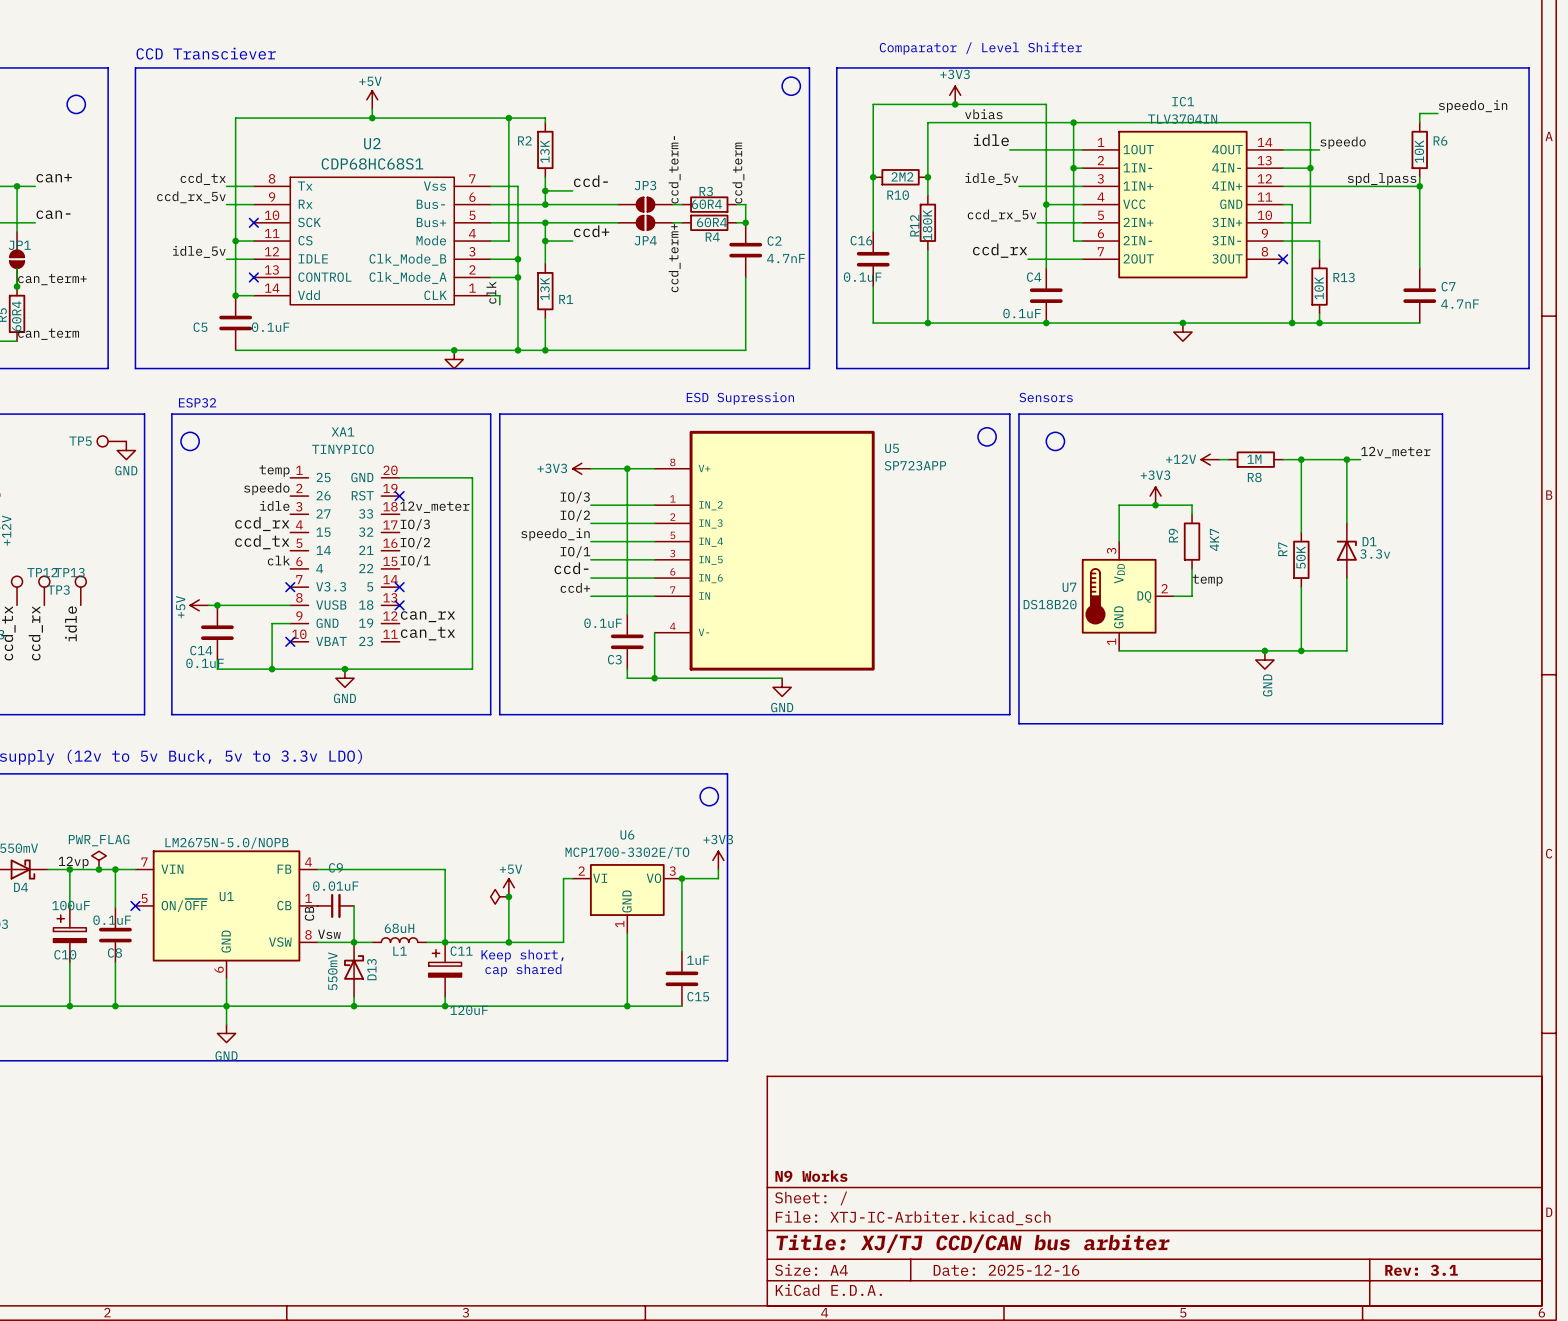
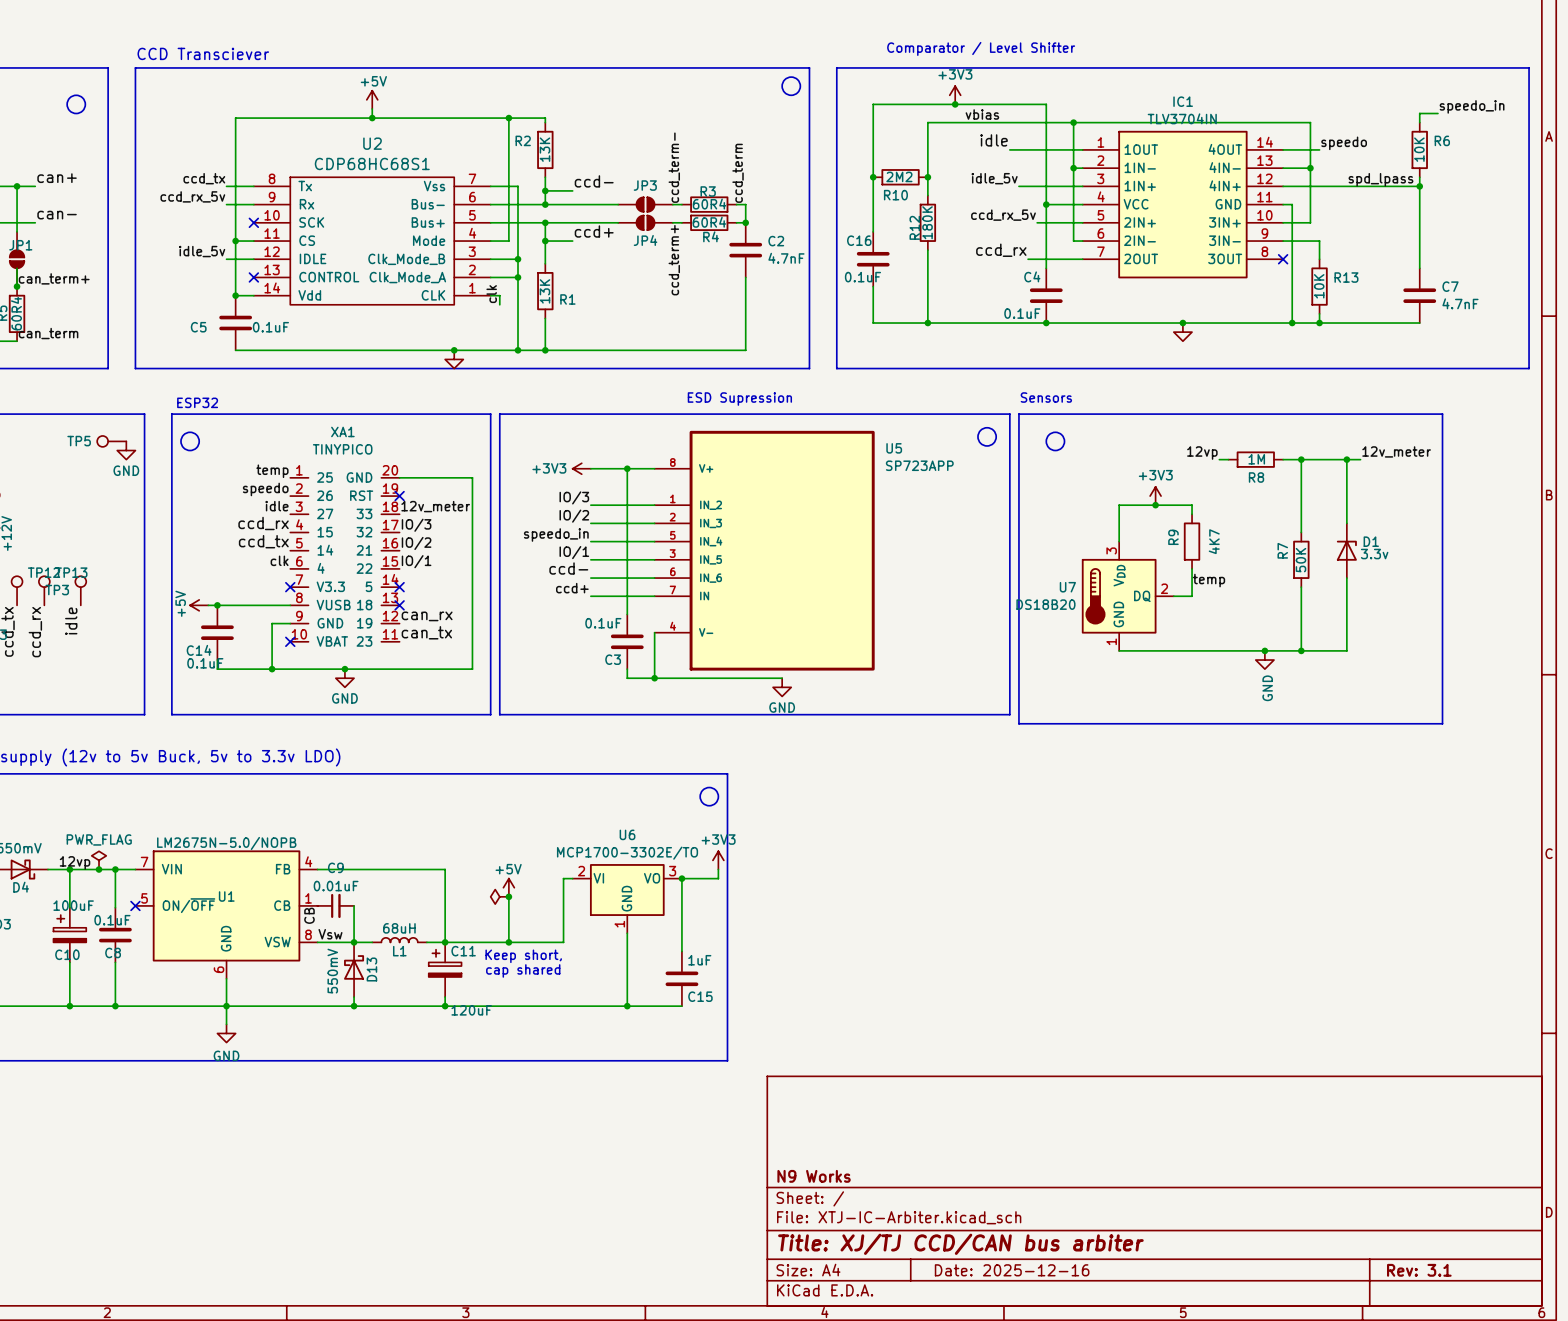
label: none -> 12vp (1202, 453)
power symbol: +12V (1210, 459) -> none

